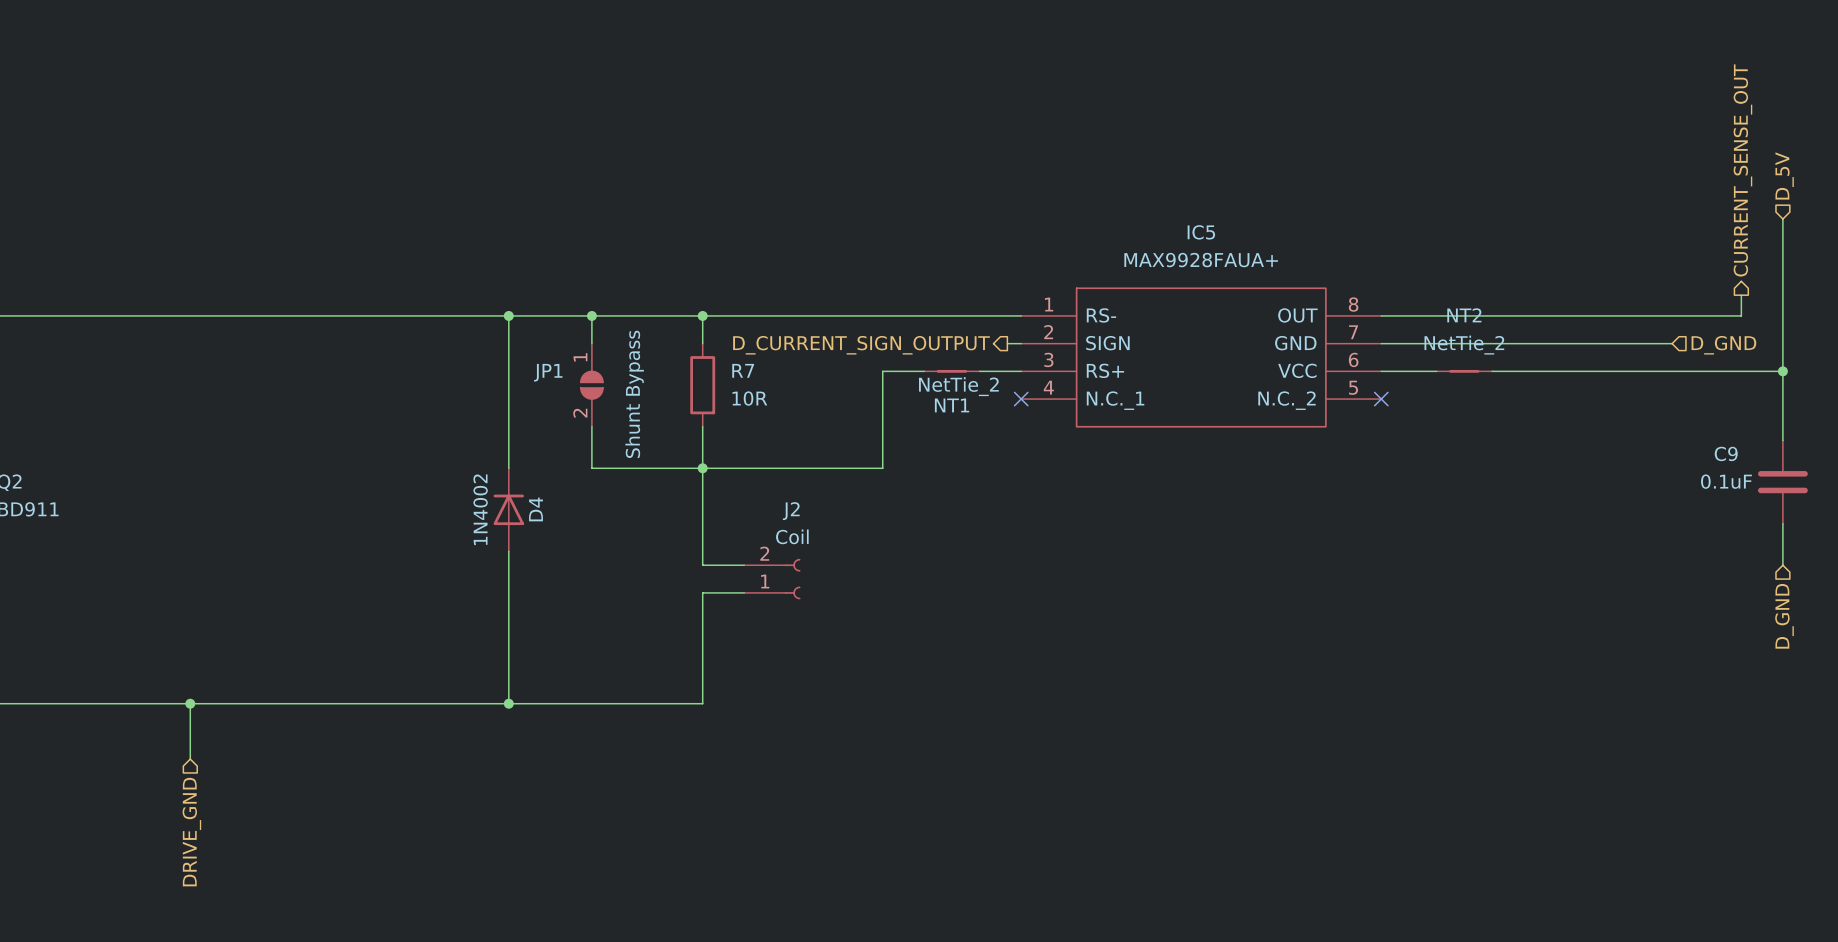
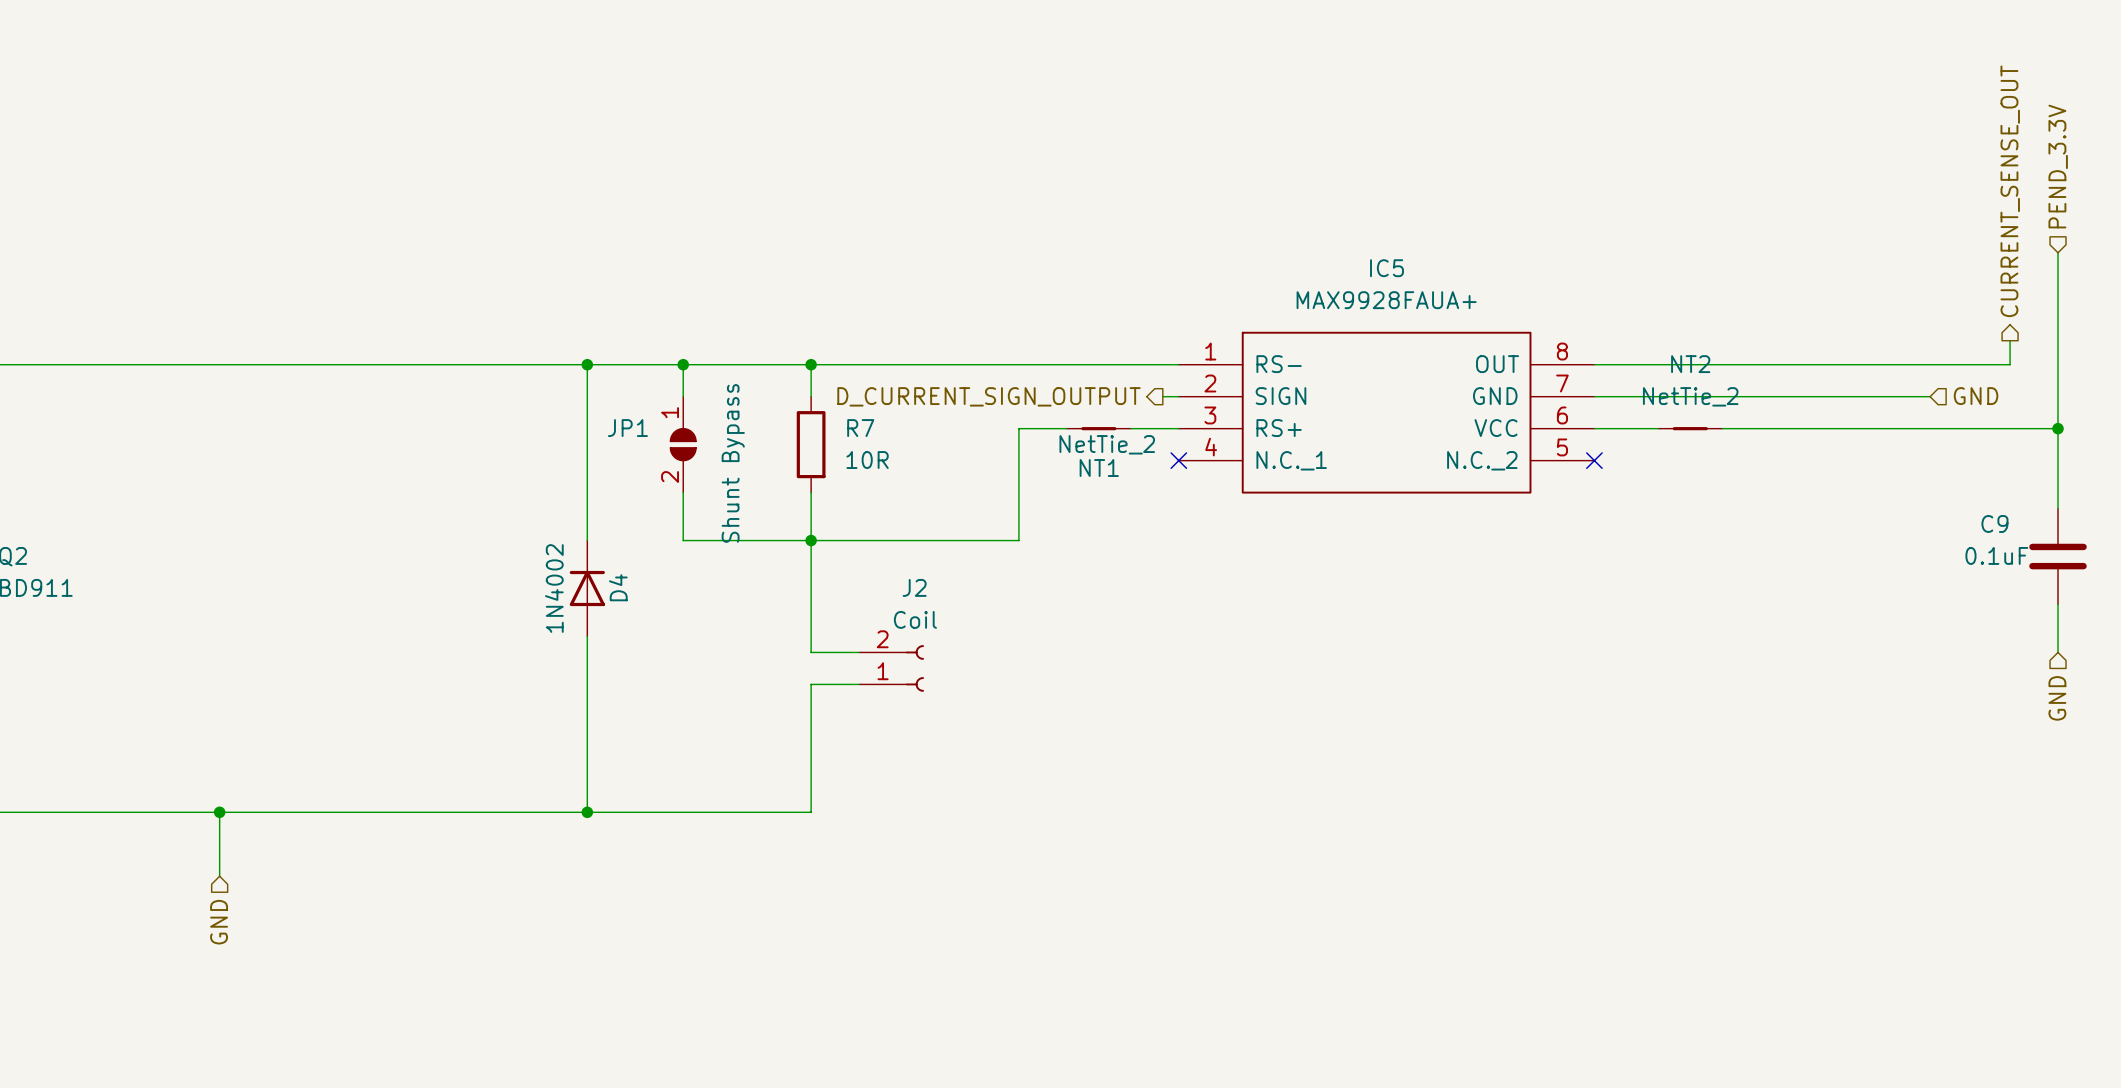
hierarchical label: D_5V (1784, 175) -> PEND_3.3V (2058, 166)
hierarchical label: D_GND (1723, 345) -> GND (1976, 396)
hierarchical label: D_GND (1784, 616) -> GND (2057, 698)
hierarchical label: DRIVE_GND (191, 832) -> GND (219, 922)

